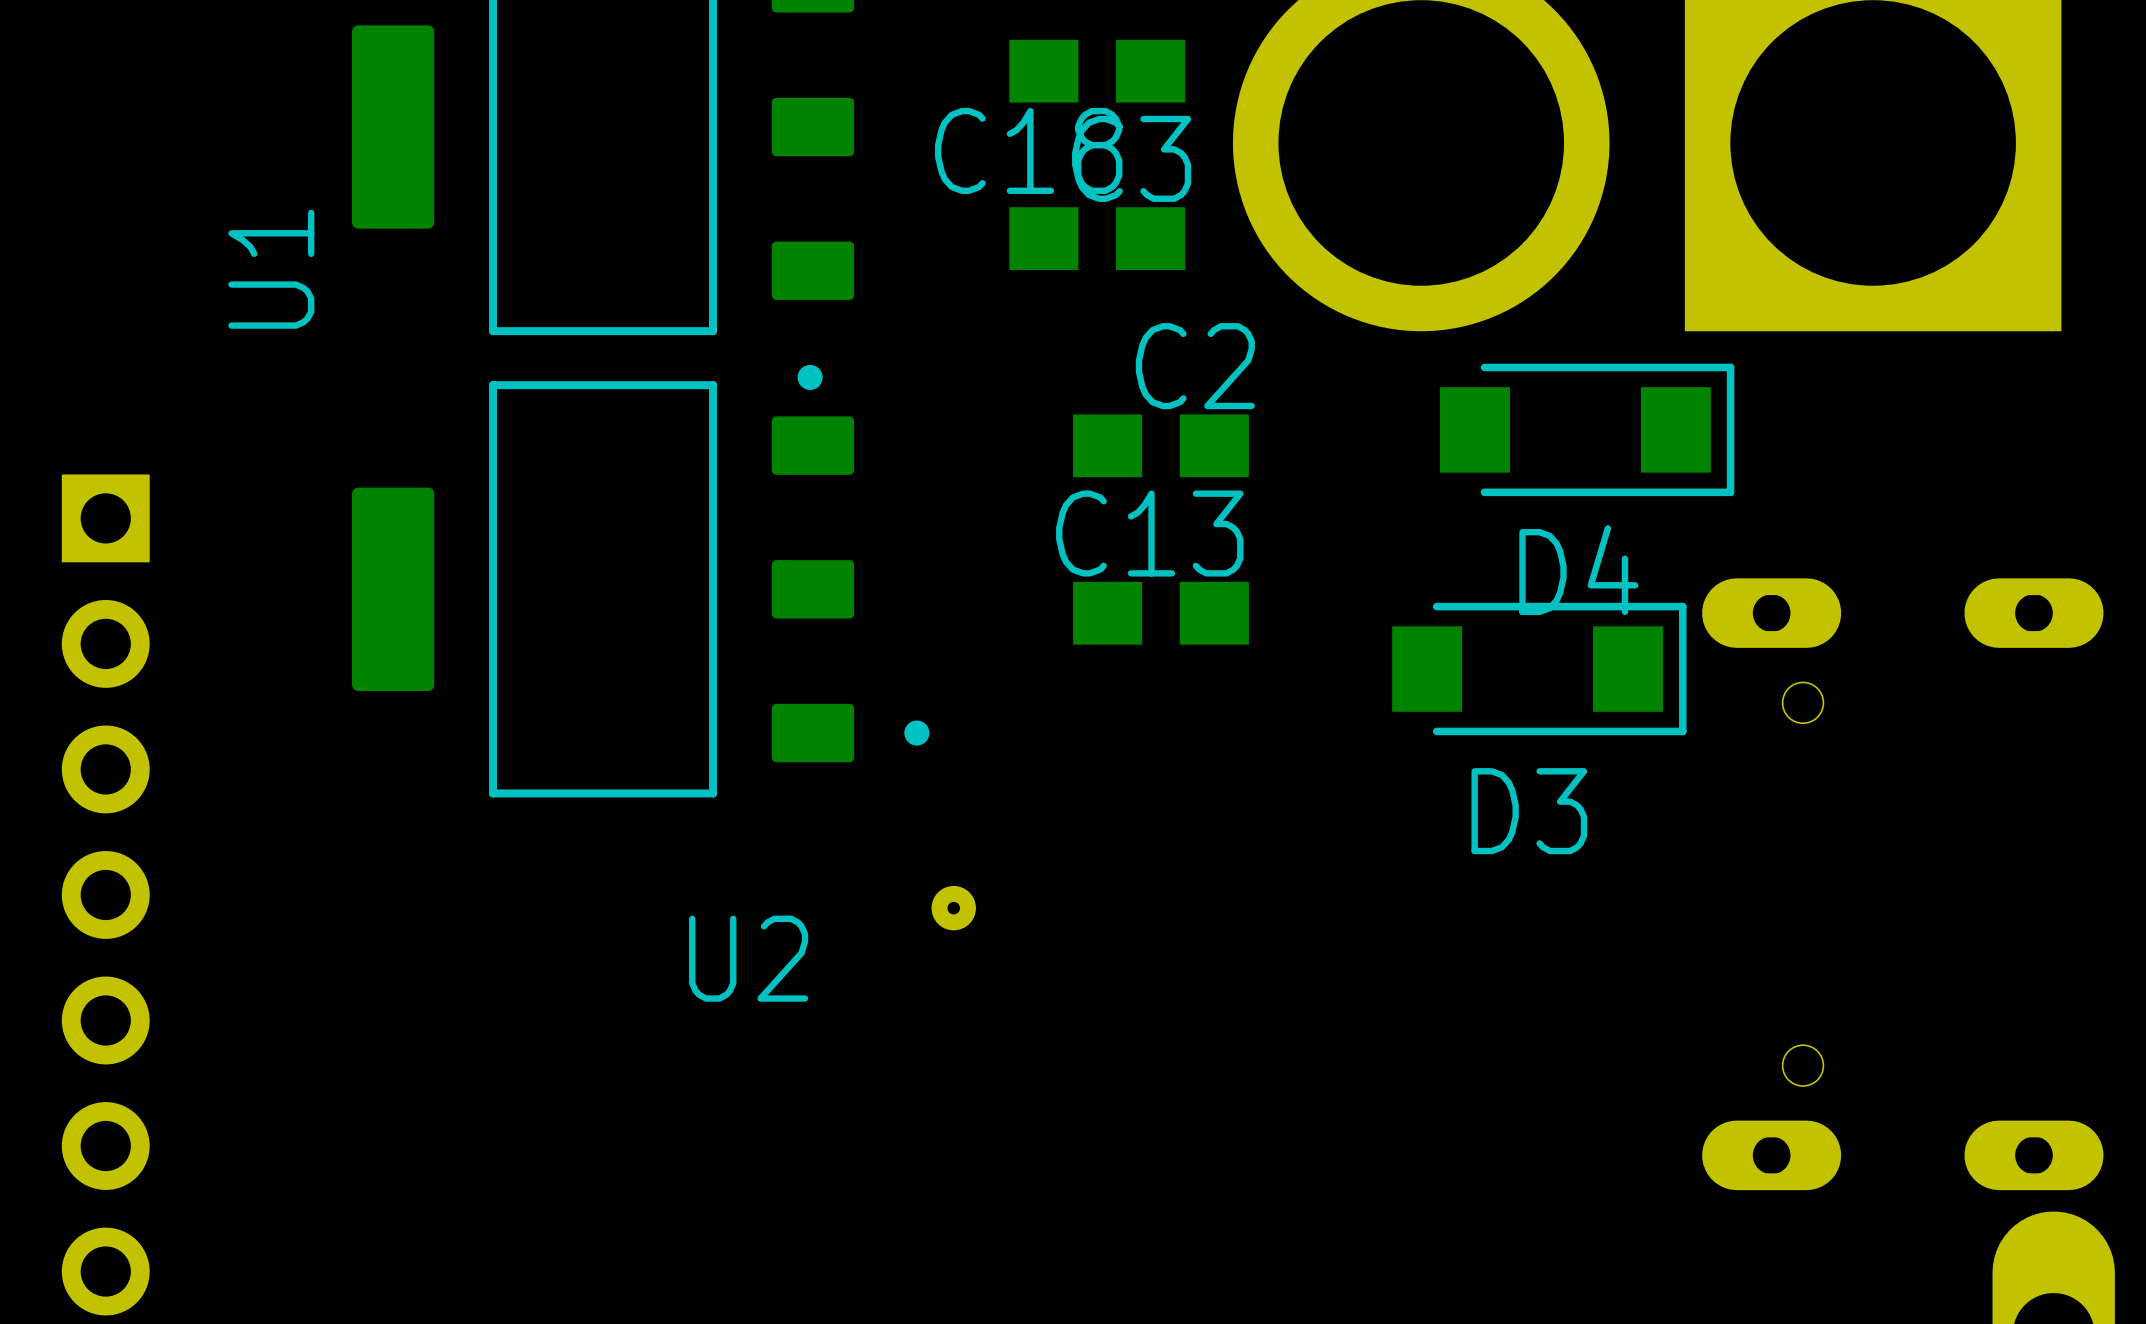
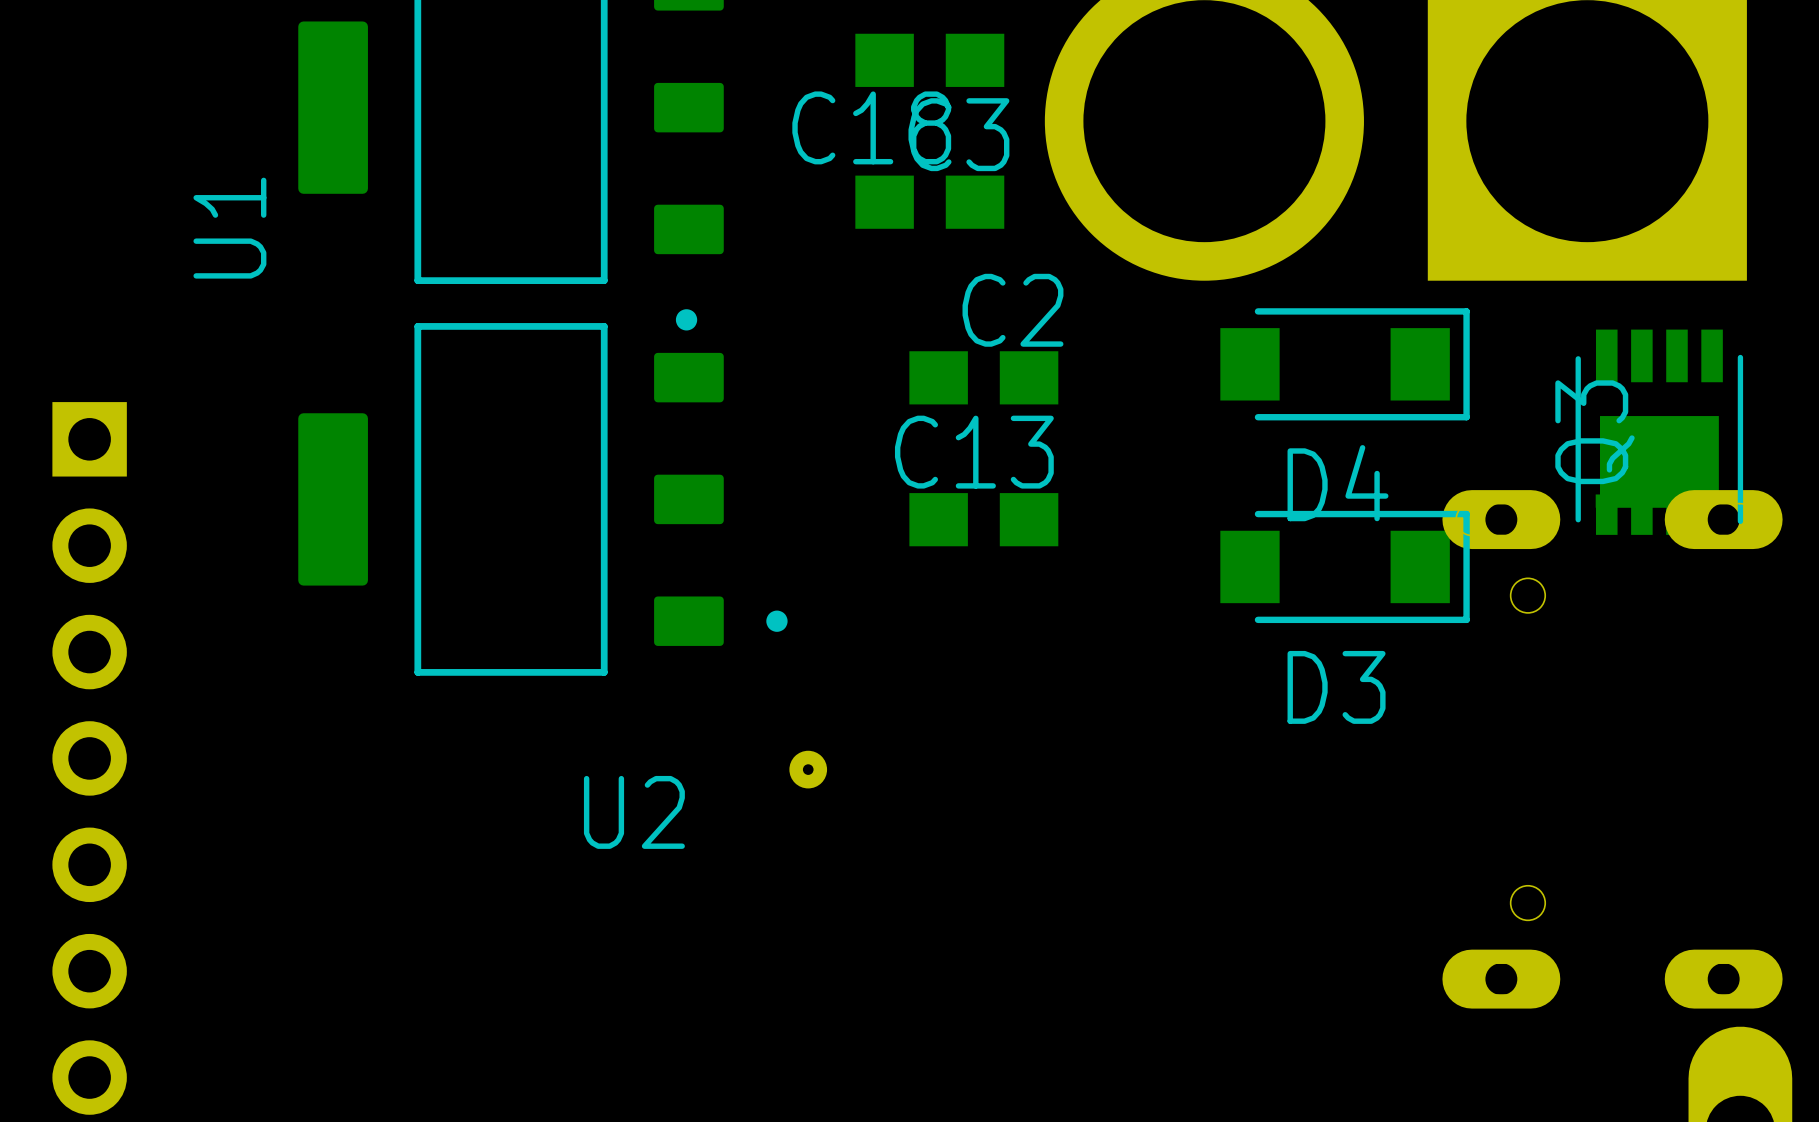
Q3: none -> (1659, 432)
D3 position: (1539, 669) -> (1345, 566)

